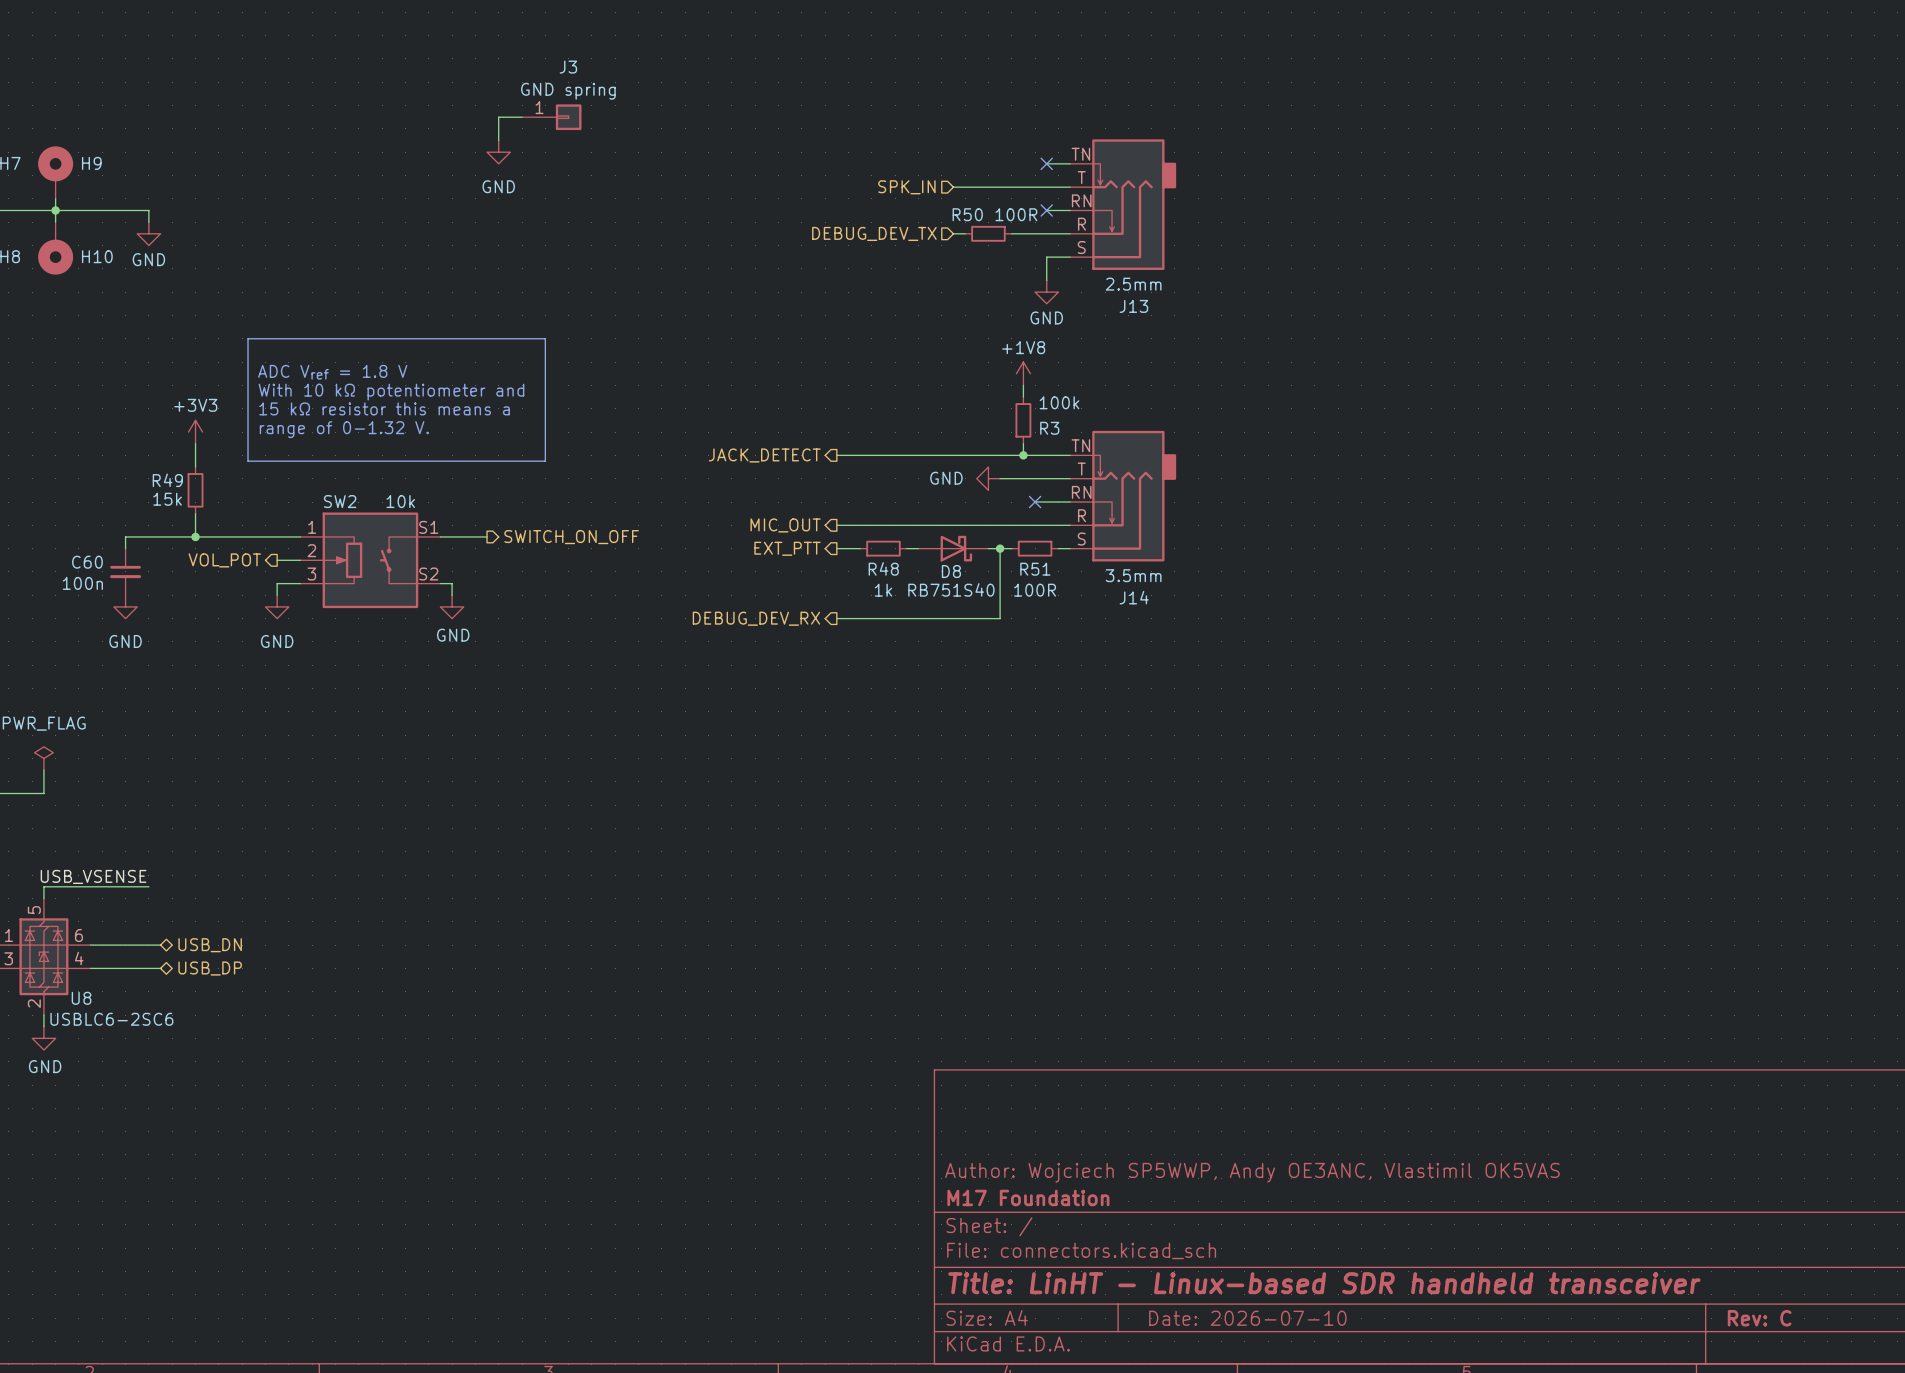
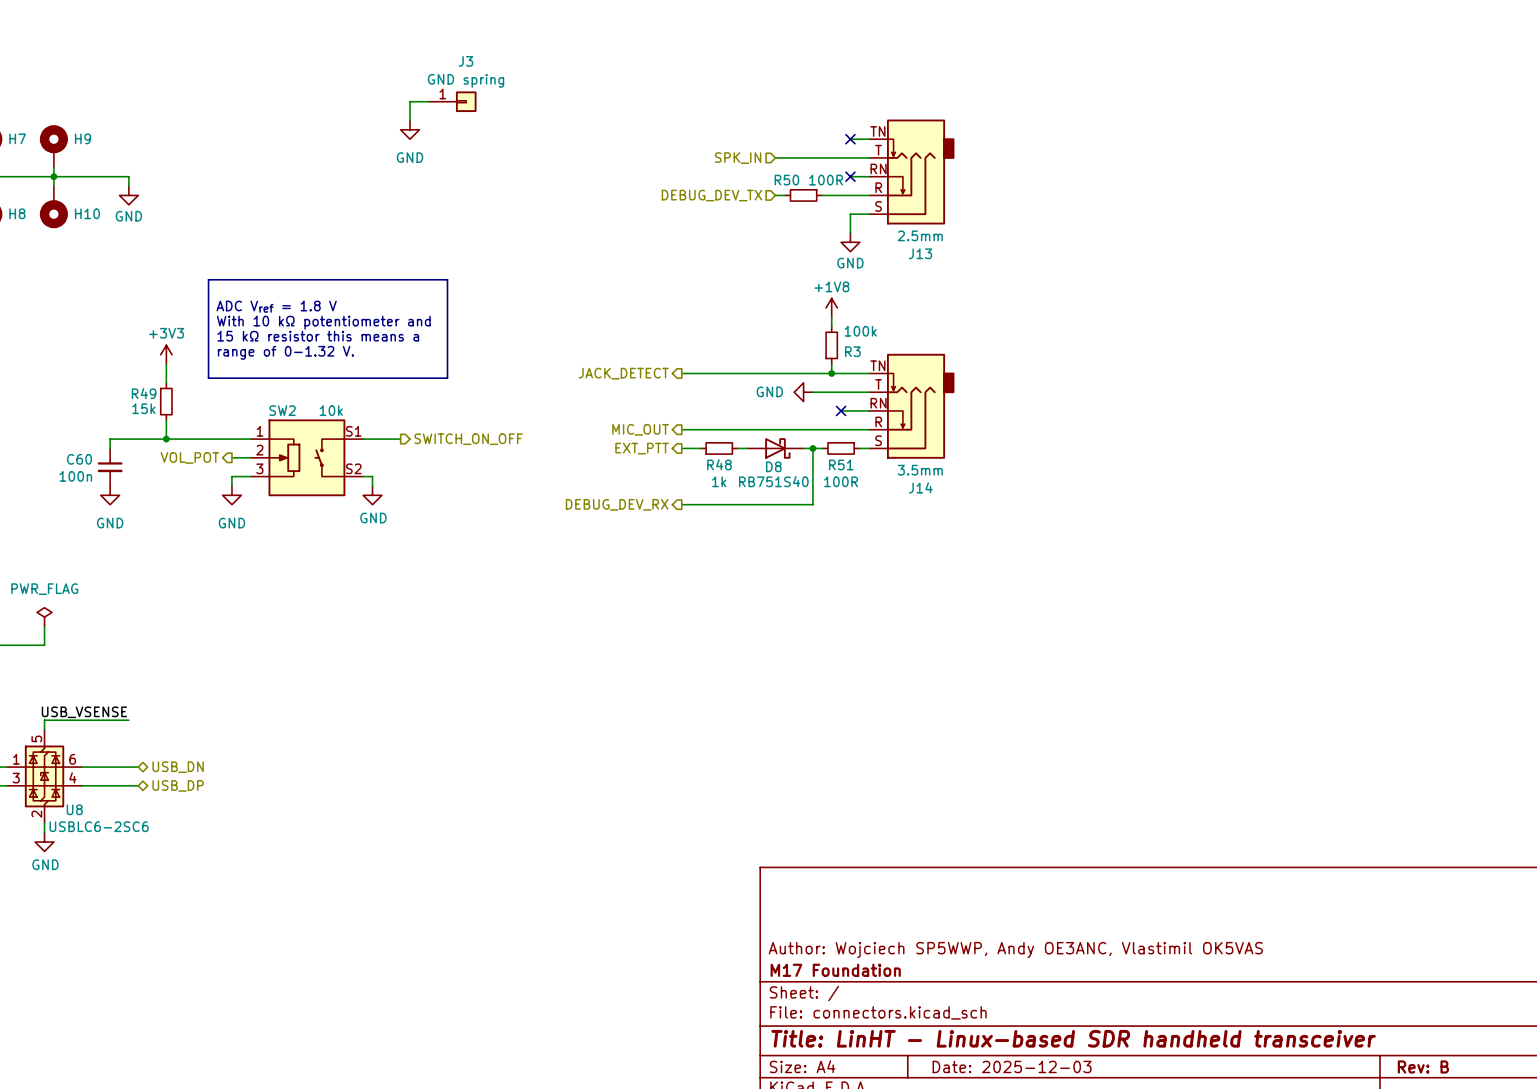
title block: Date: 2026-07-10 (1247, 1318) -> Date: 2025-12-03 (1012, 1066)
title block: Rev: C (1759, 1318) -> Rev: B (1423, 1066)

